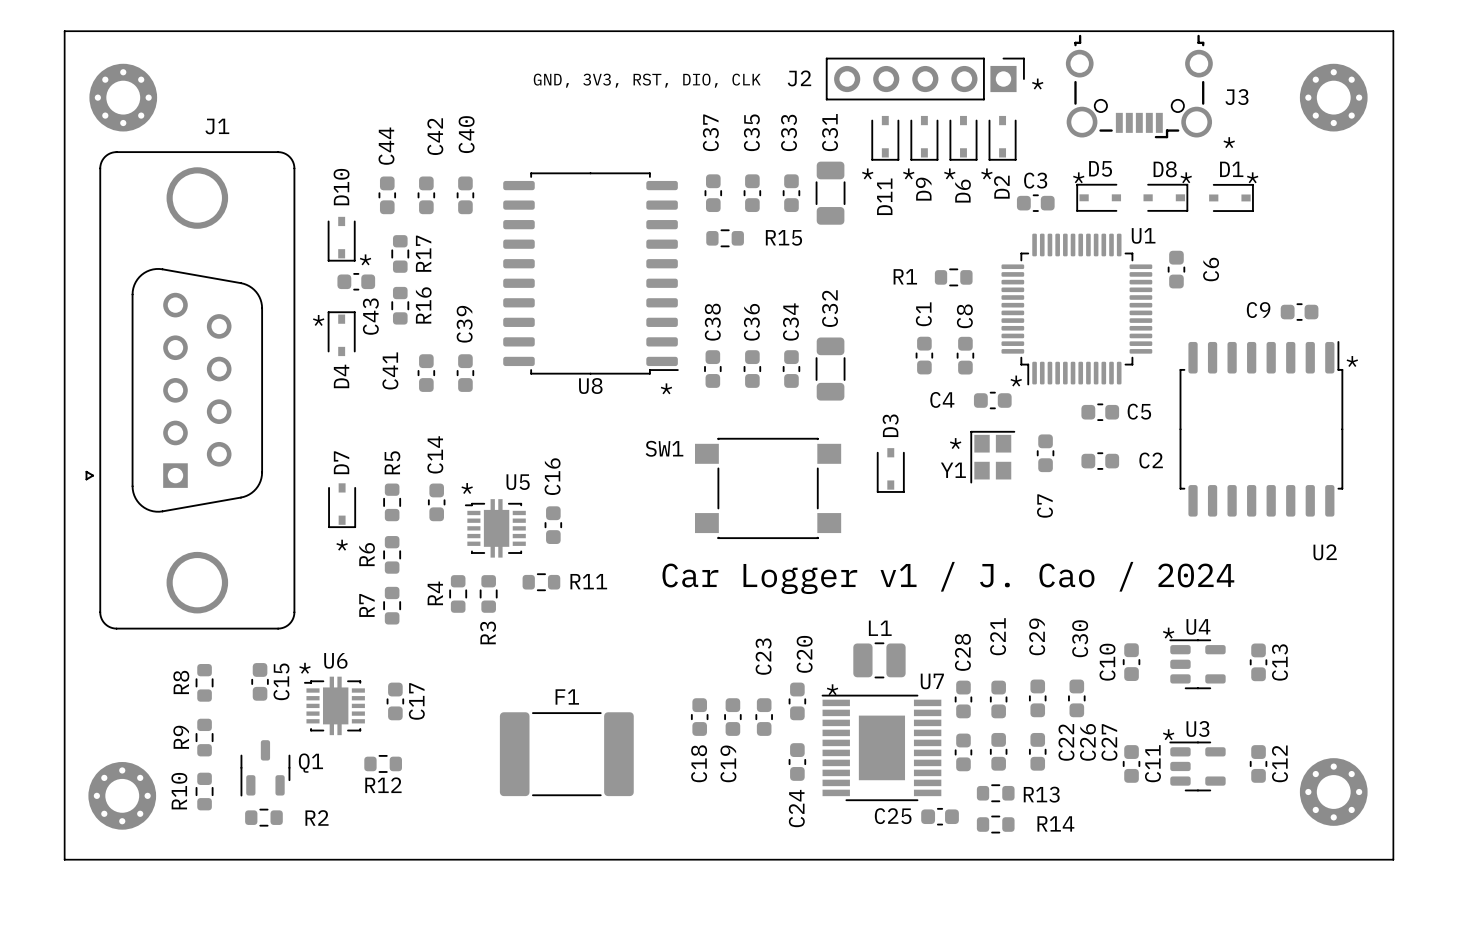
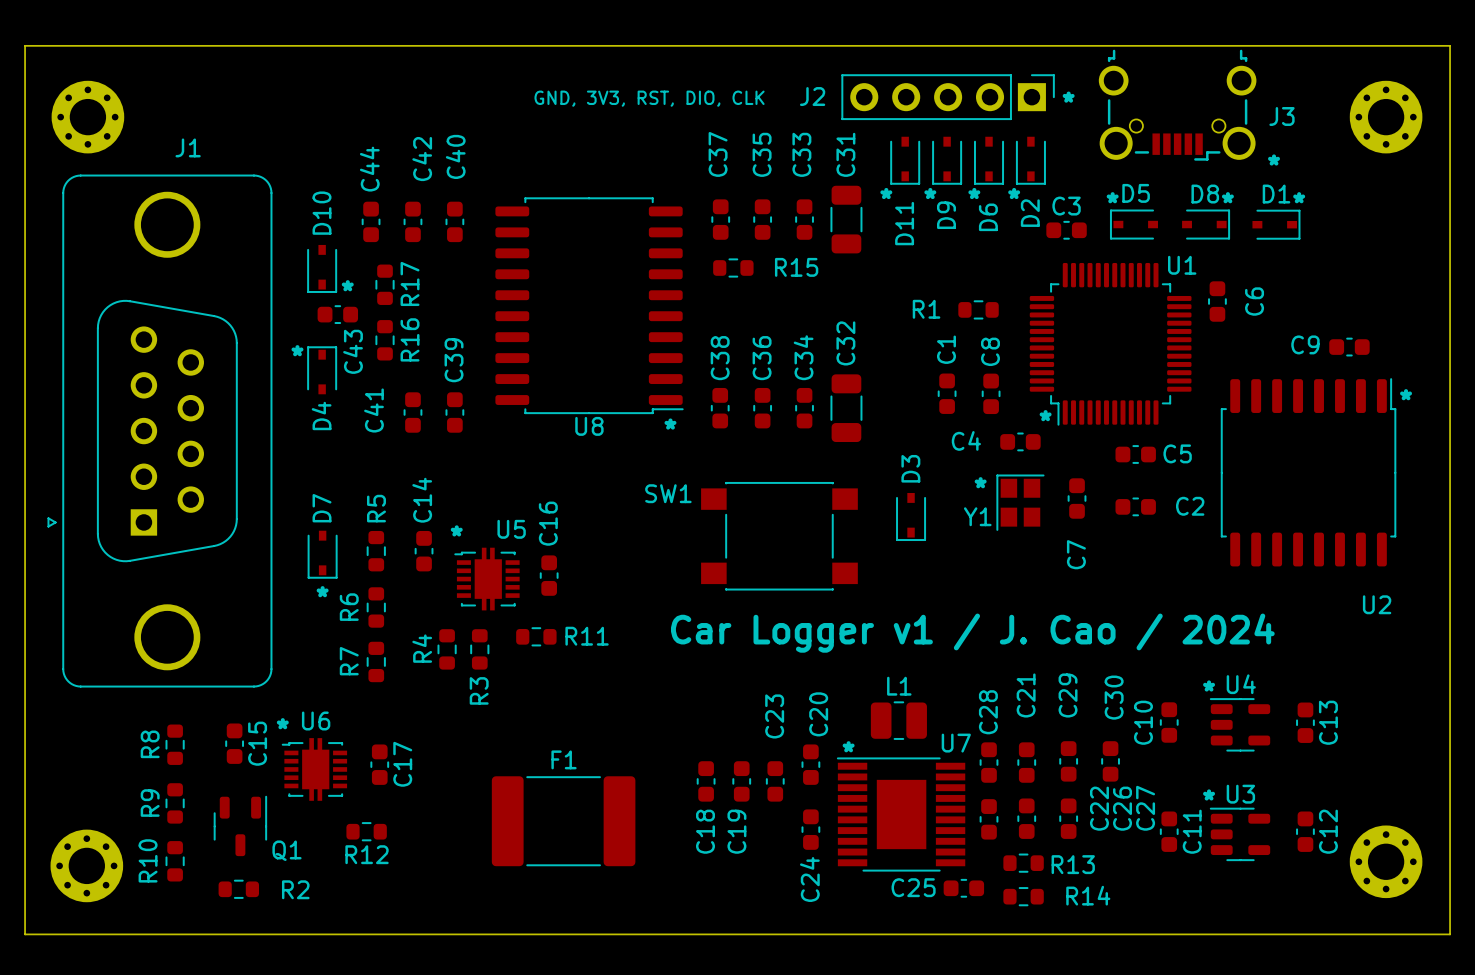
Q1 rotation: 0° (265, 768) -> 180° (240, 825)

